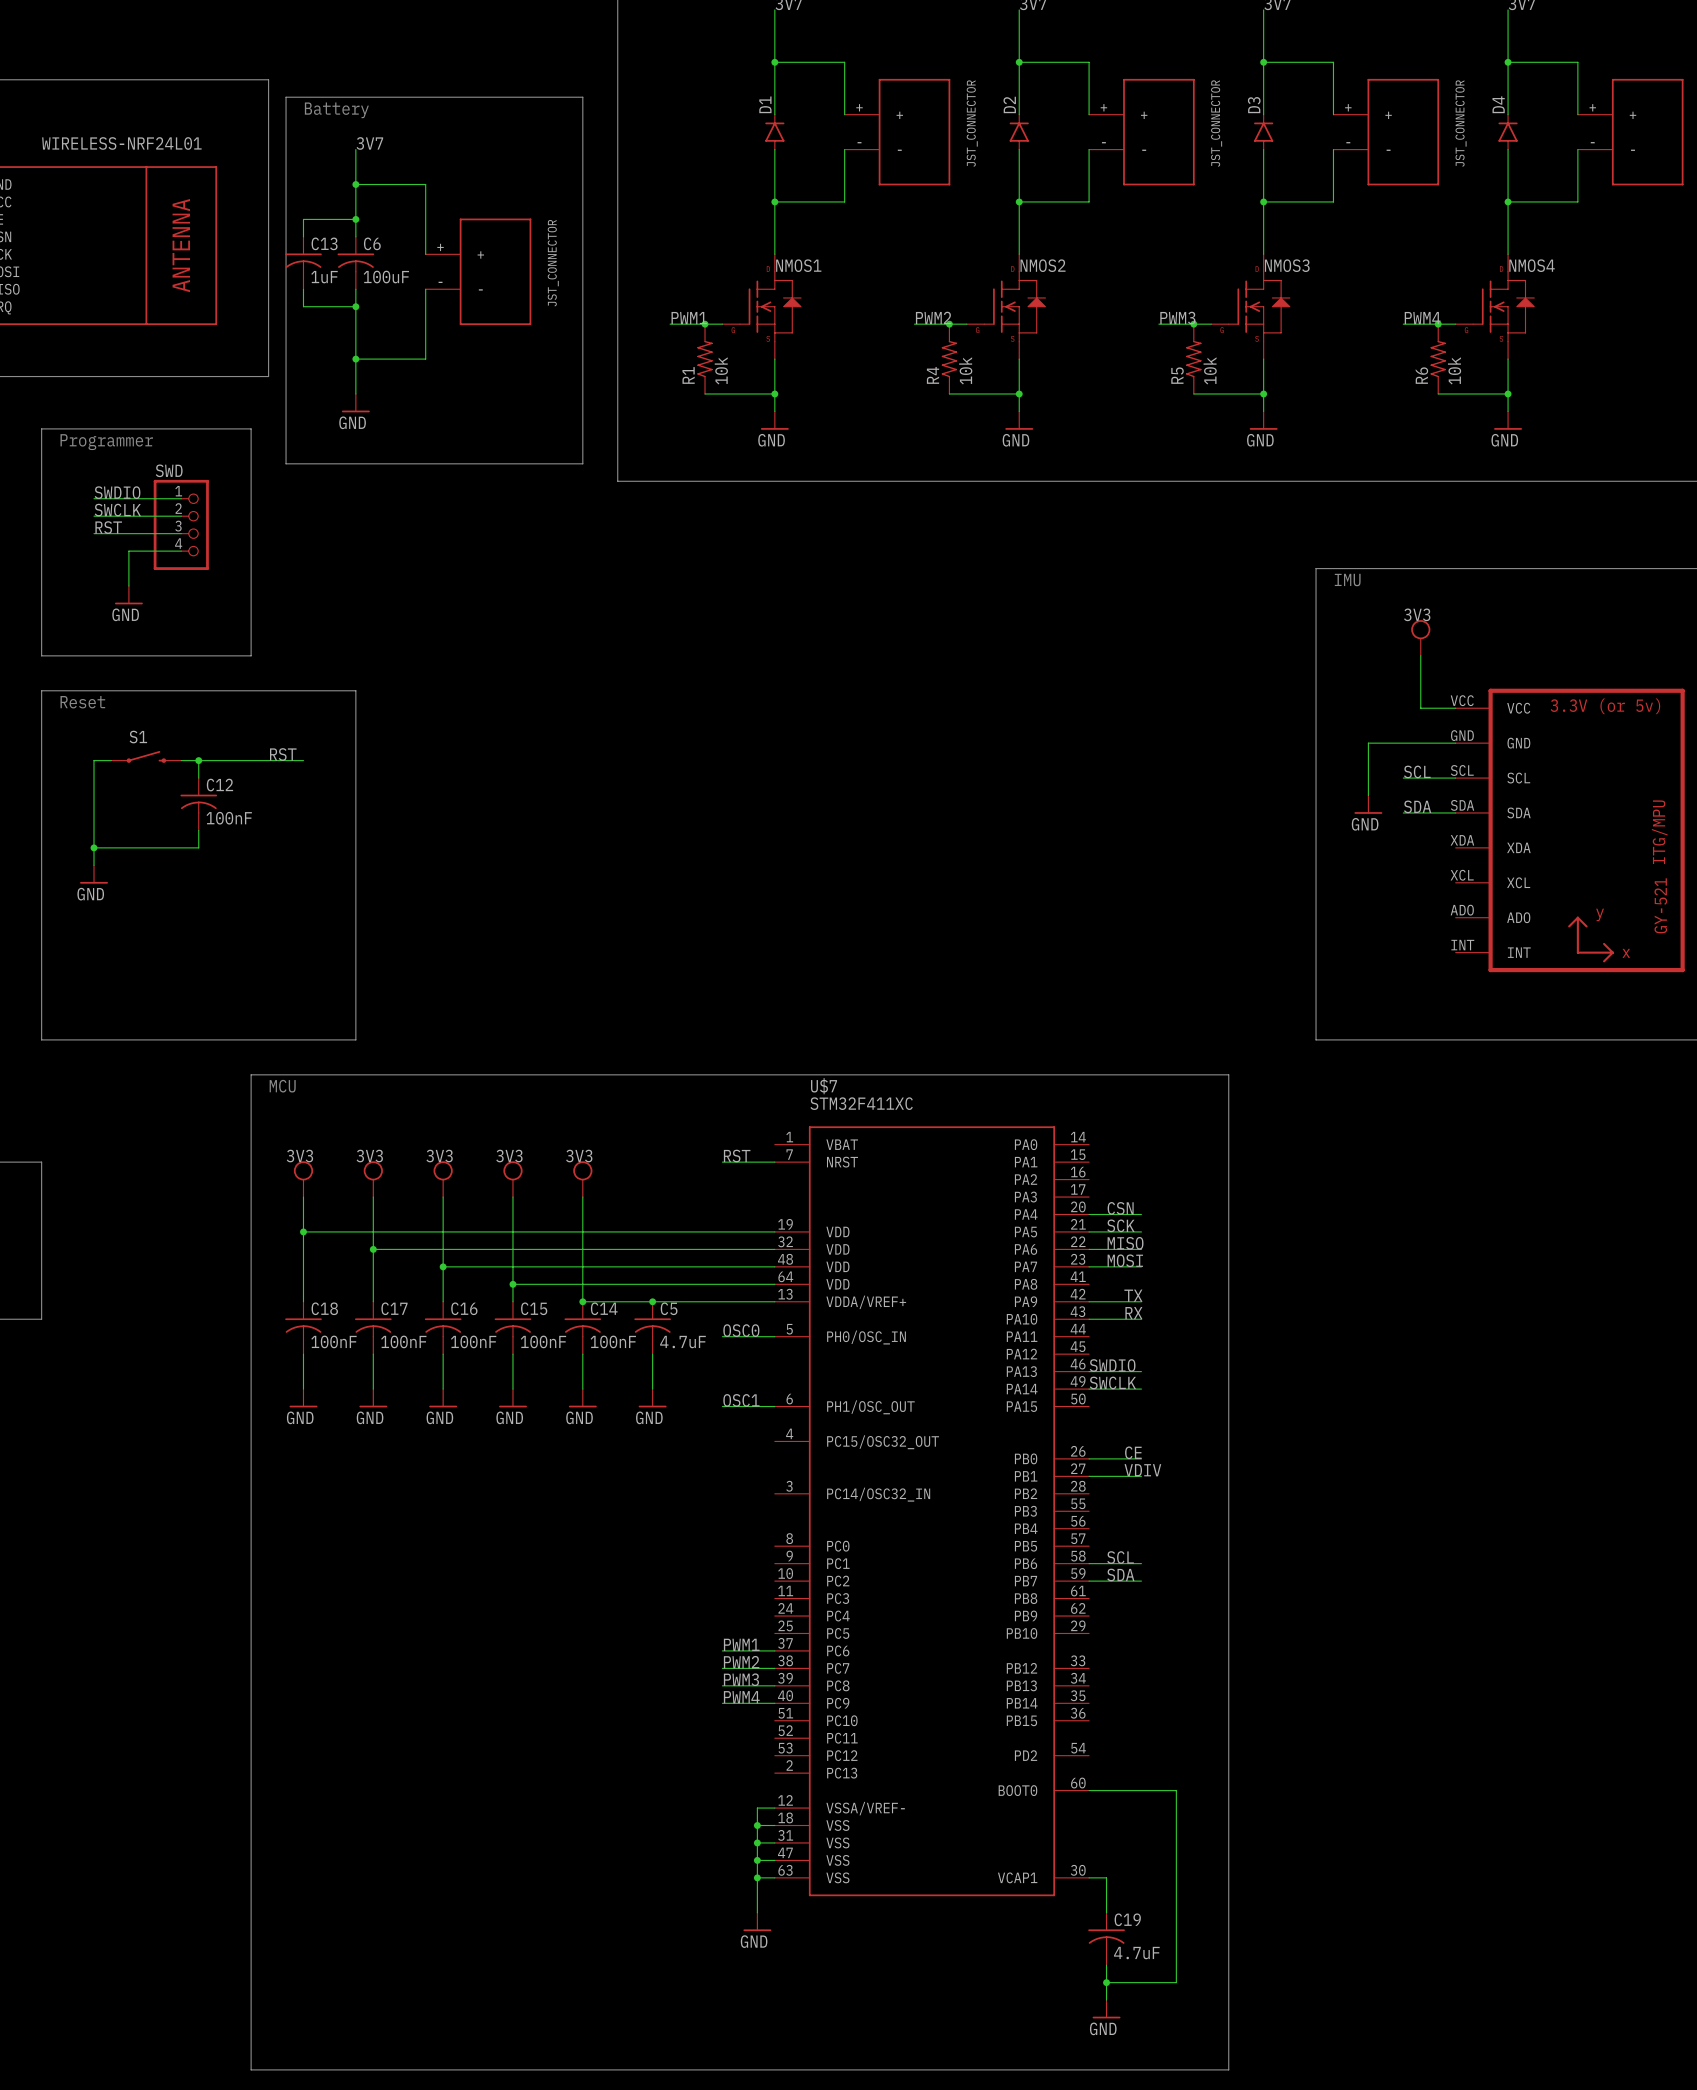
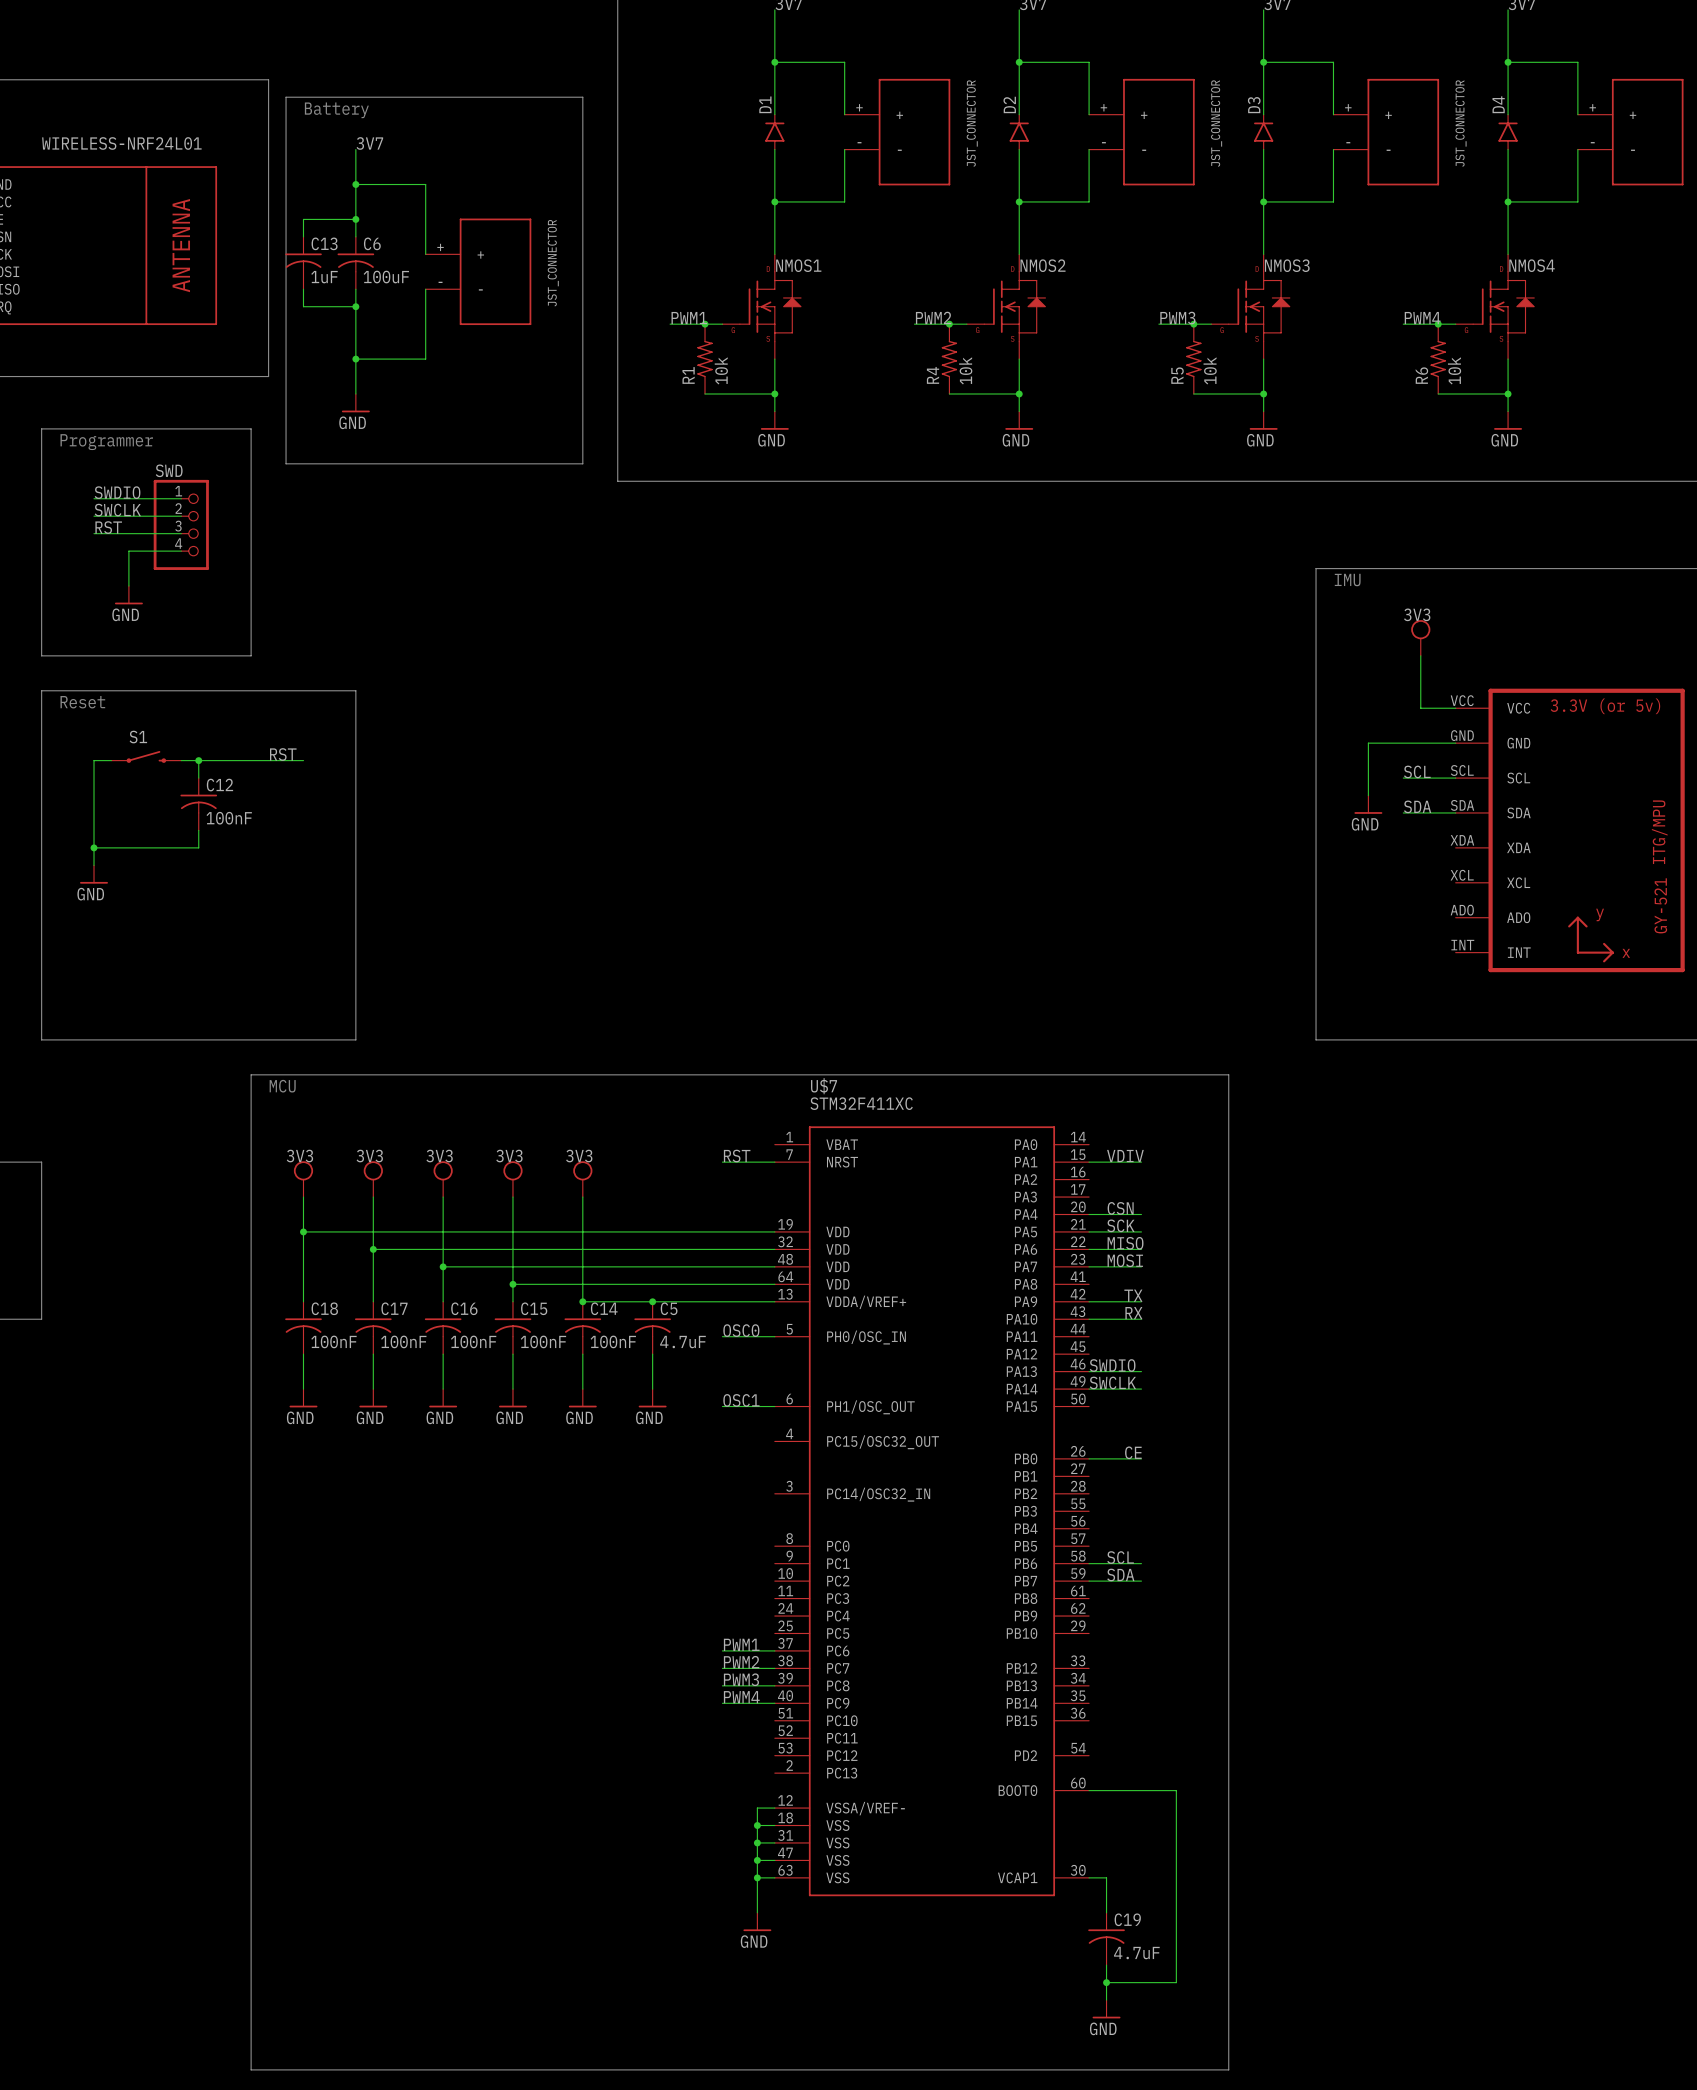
label: none -> VDIV (1125, 1156)
wire: none -> (1089, 1162) (1141, 1162)
label: VDIV (1142, 1470) -> none
wire: (1089, 1476) (1141, 1476) -> none

